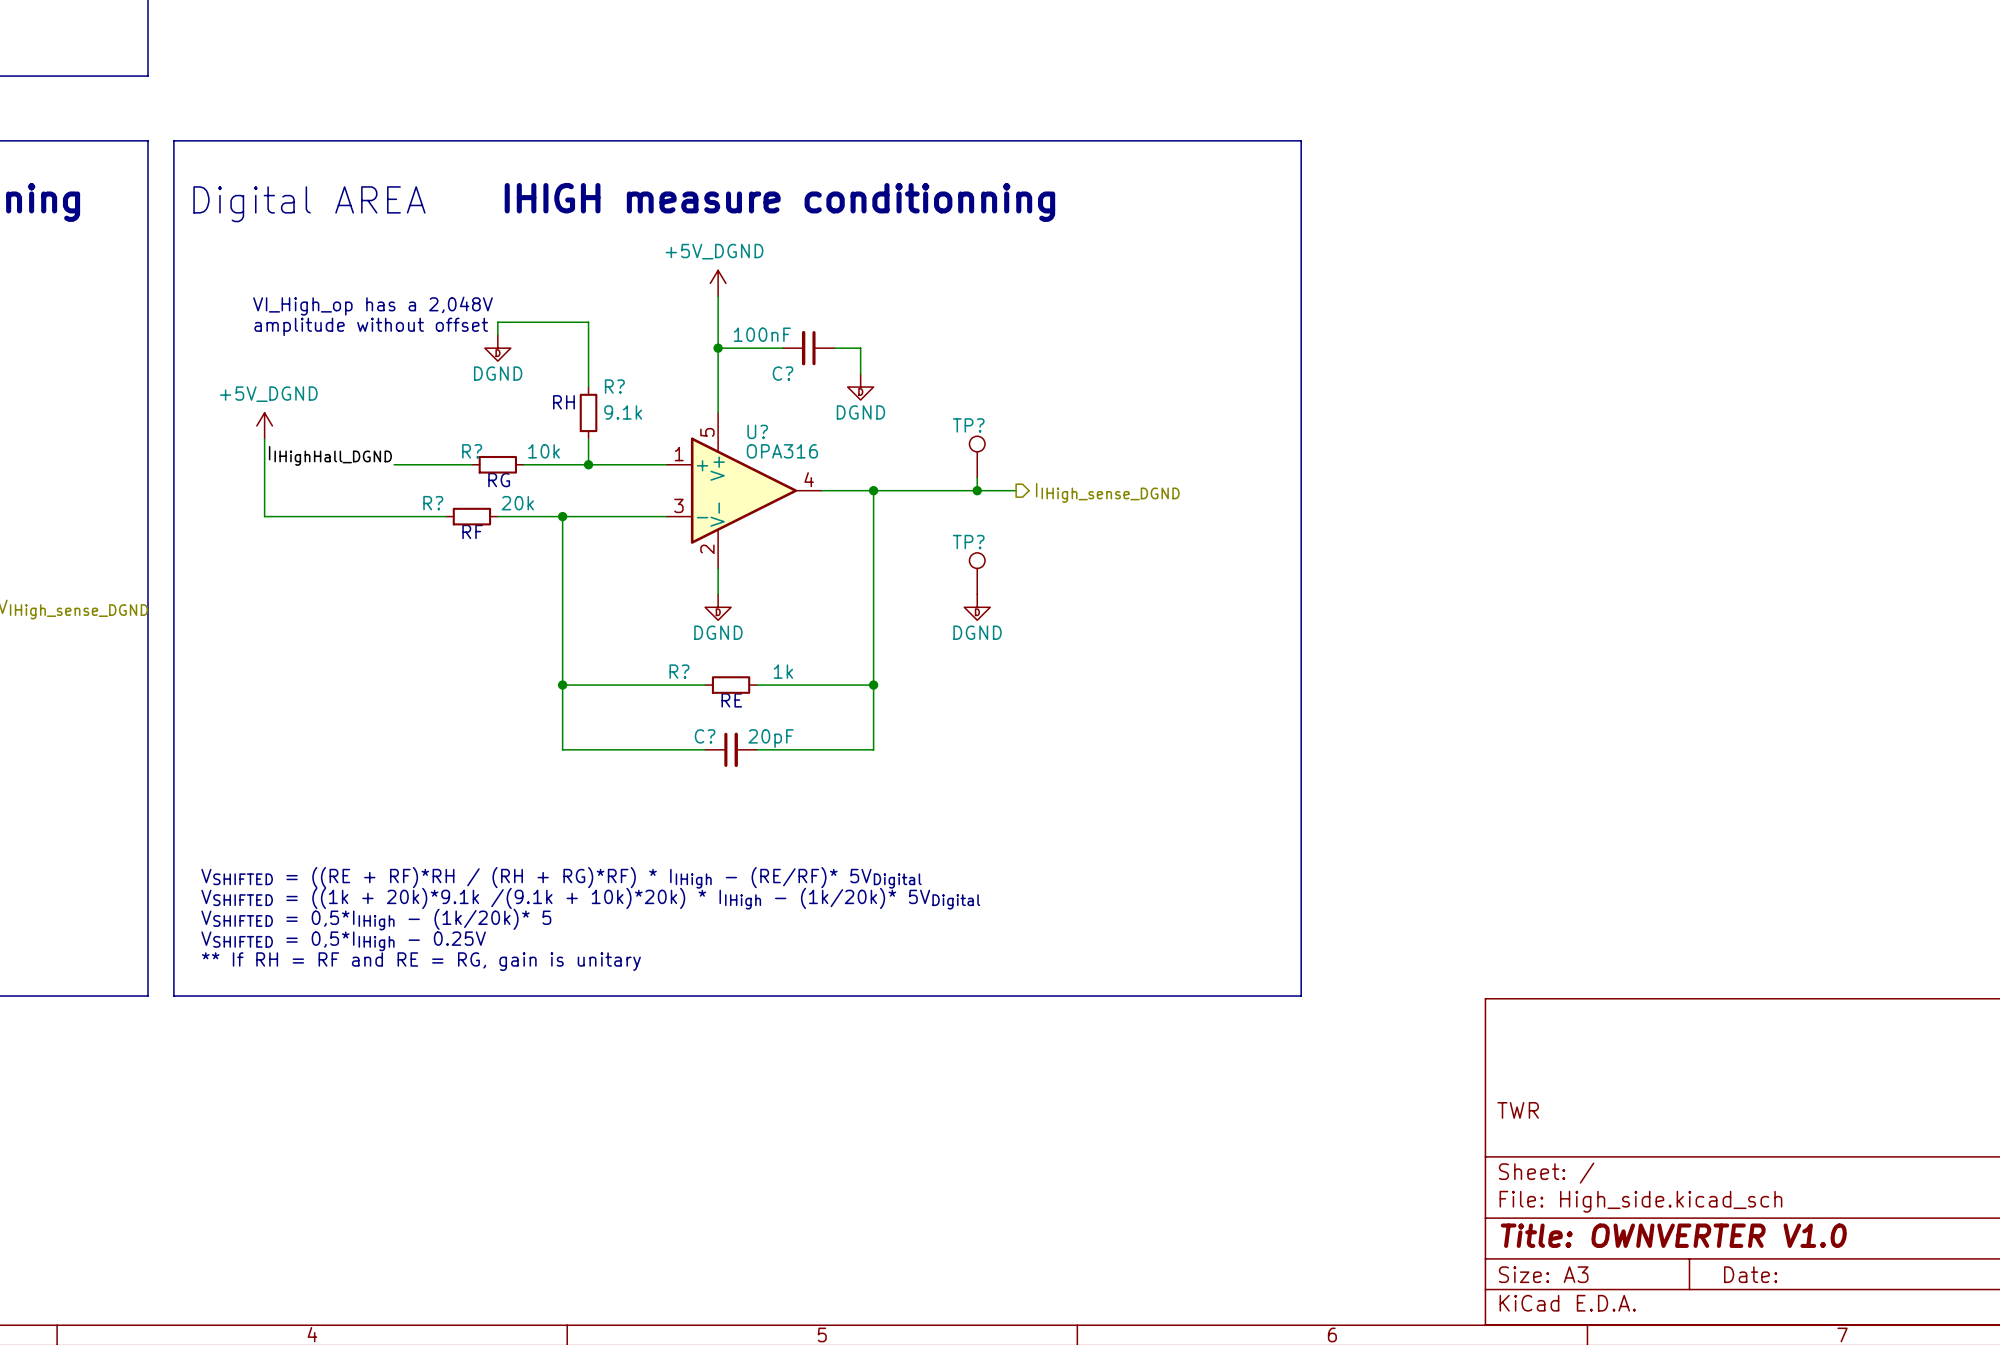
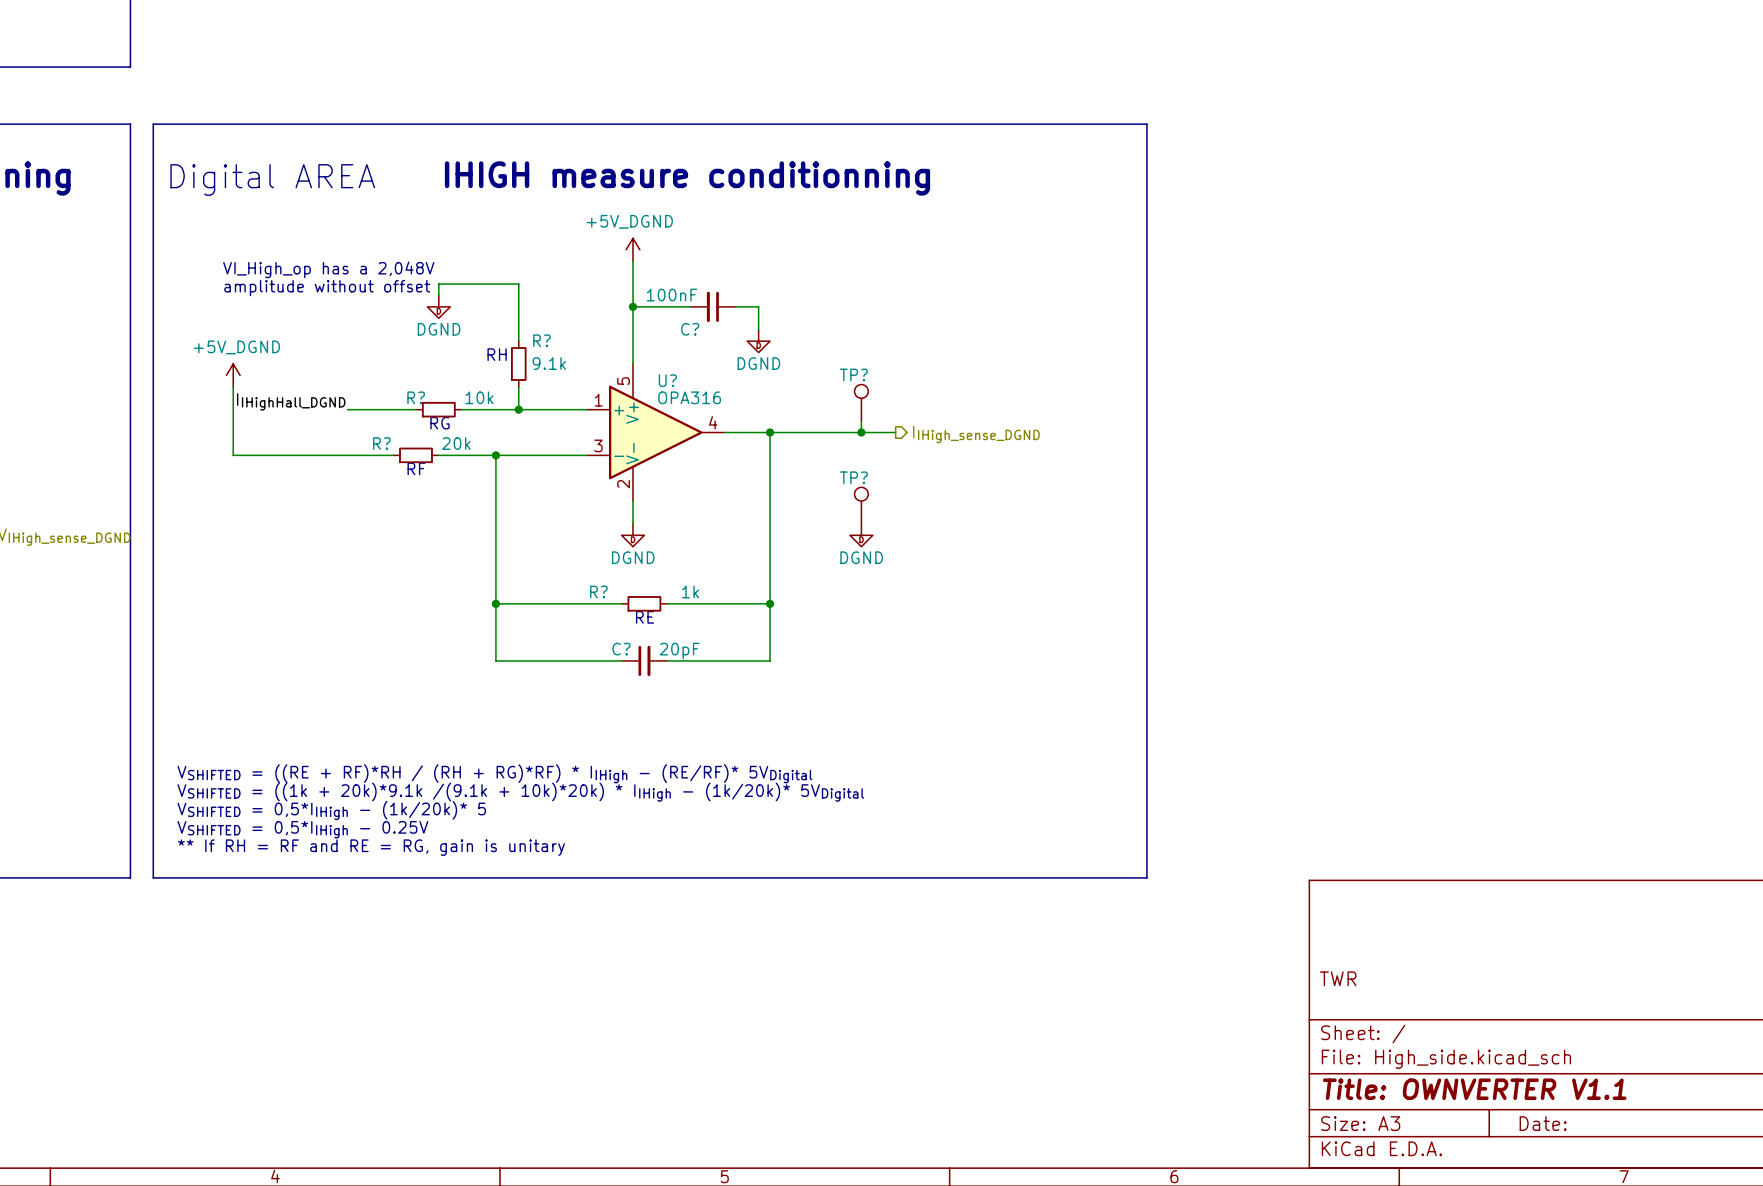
title block: Title: OWNVERTER V1.0 (1673, 1235) -> Title: OWNVERTER V1.1 (1474, 1089)

